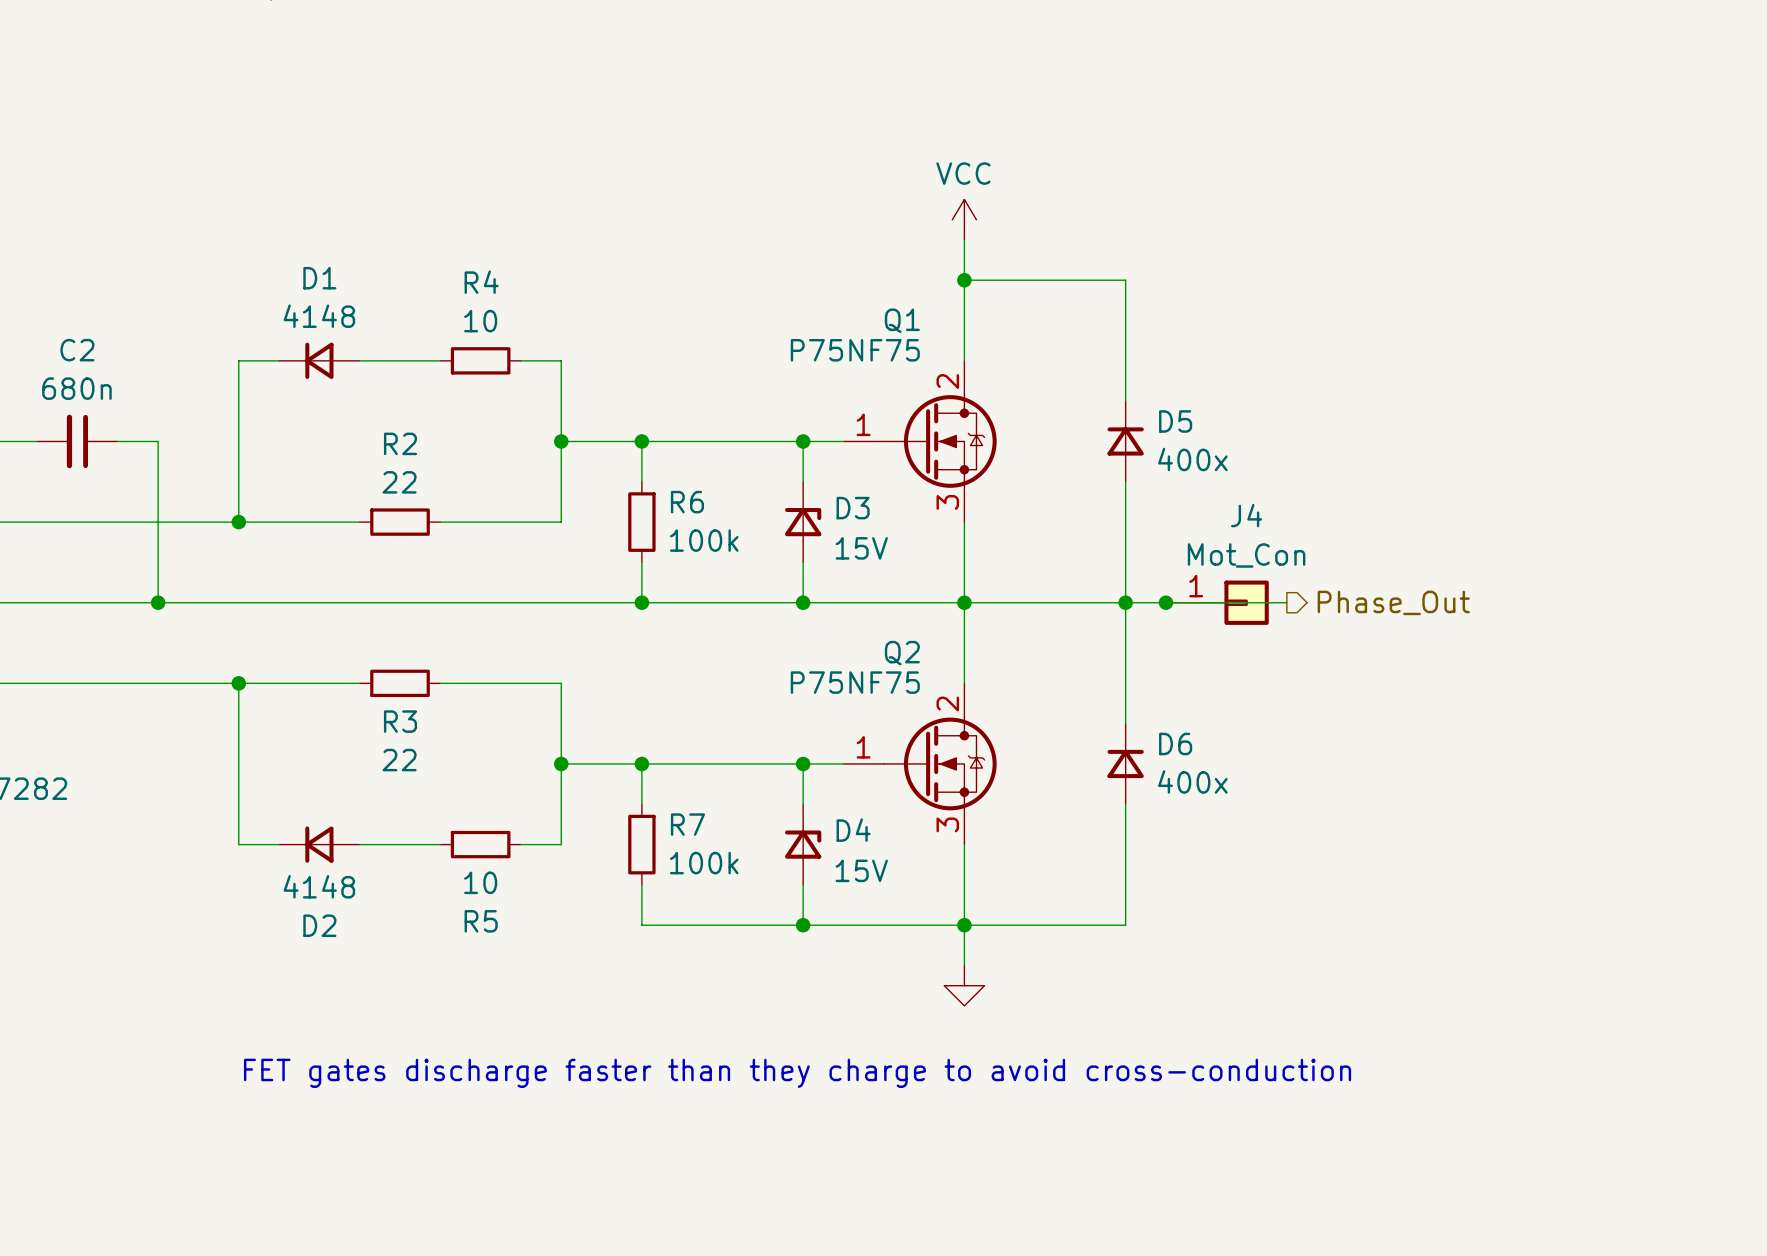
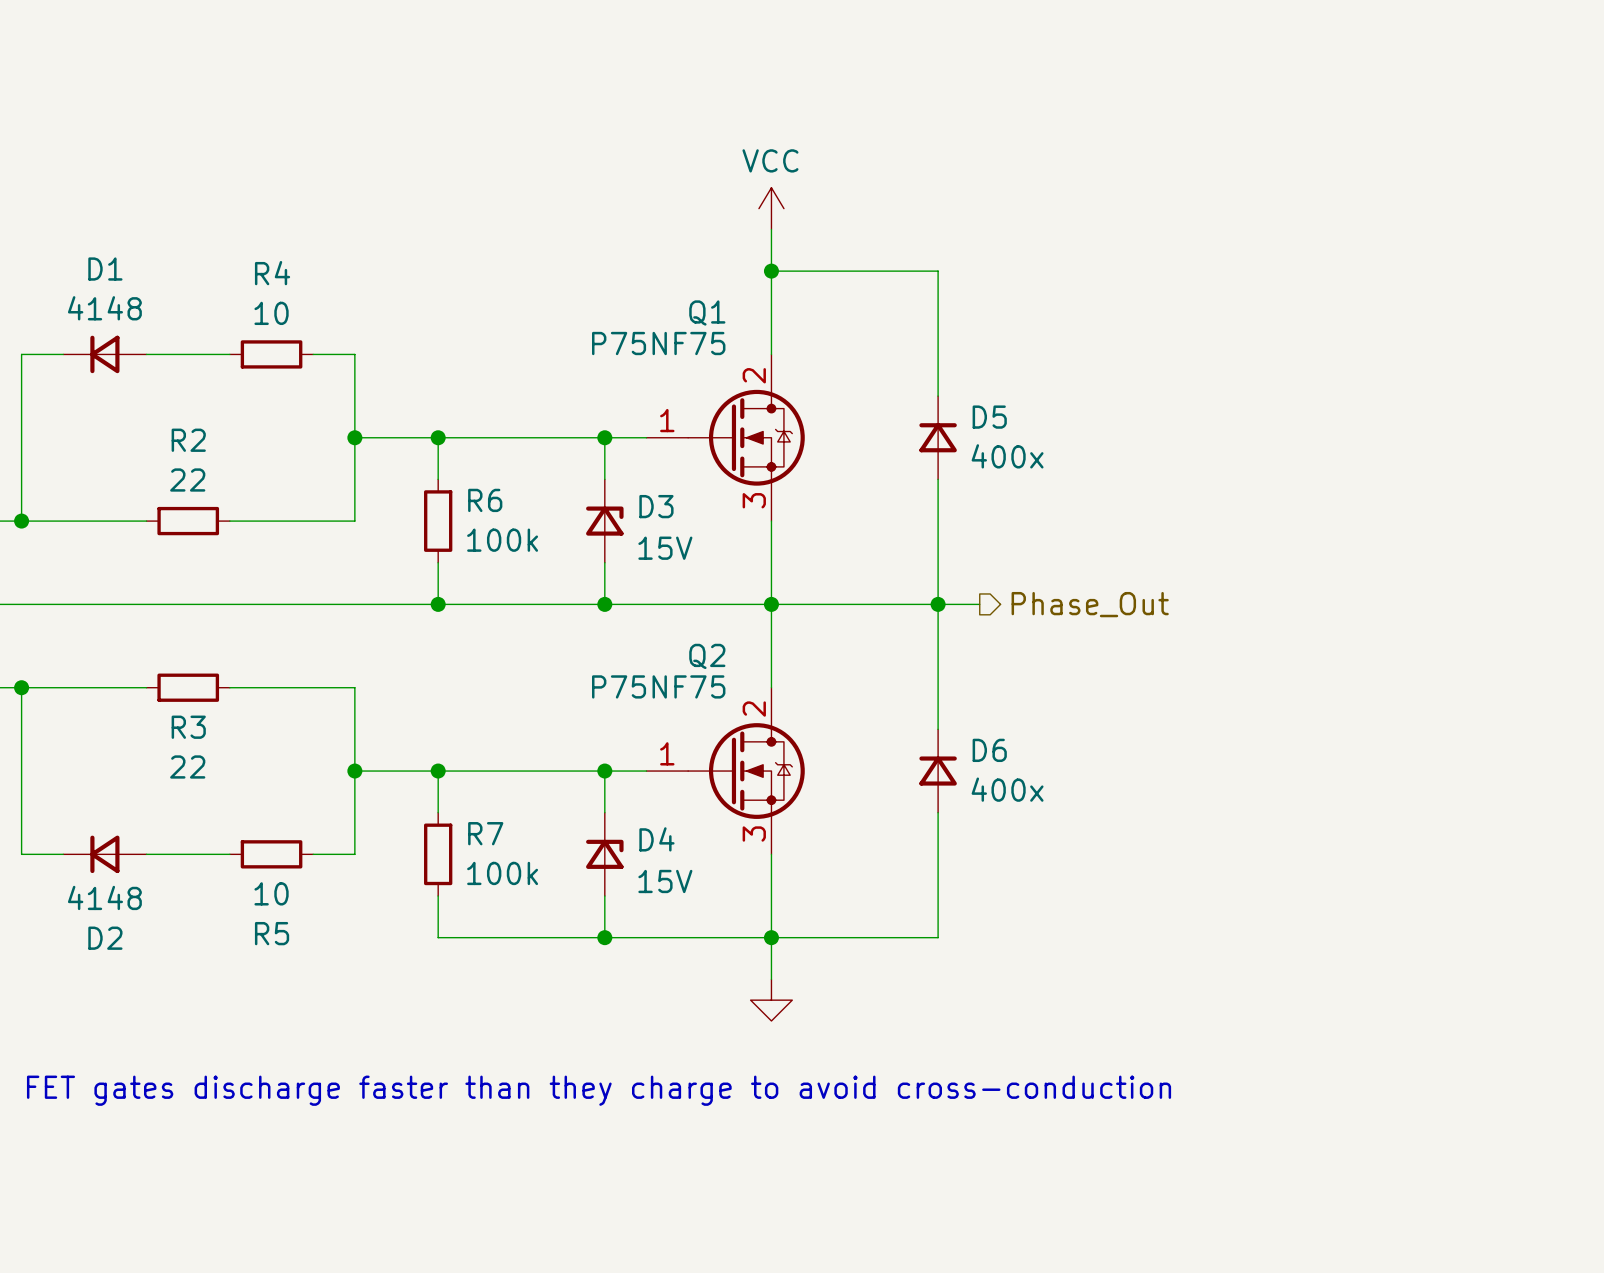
wire: (1165, 602) (1286, 602) -> none
junction: (1165, 602) -> none
J4: Mot_Con (1217, 602) -> none
hierarchical label position: Phase_Out (1393, 602) -> Phase_Out (1090, 604)

